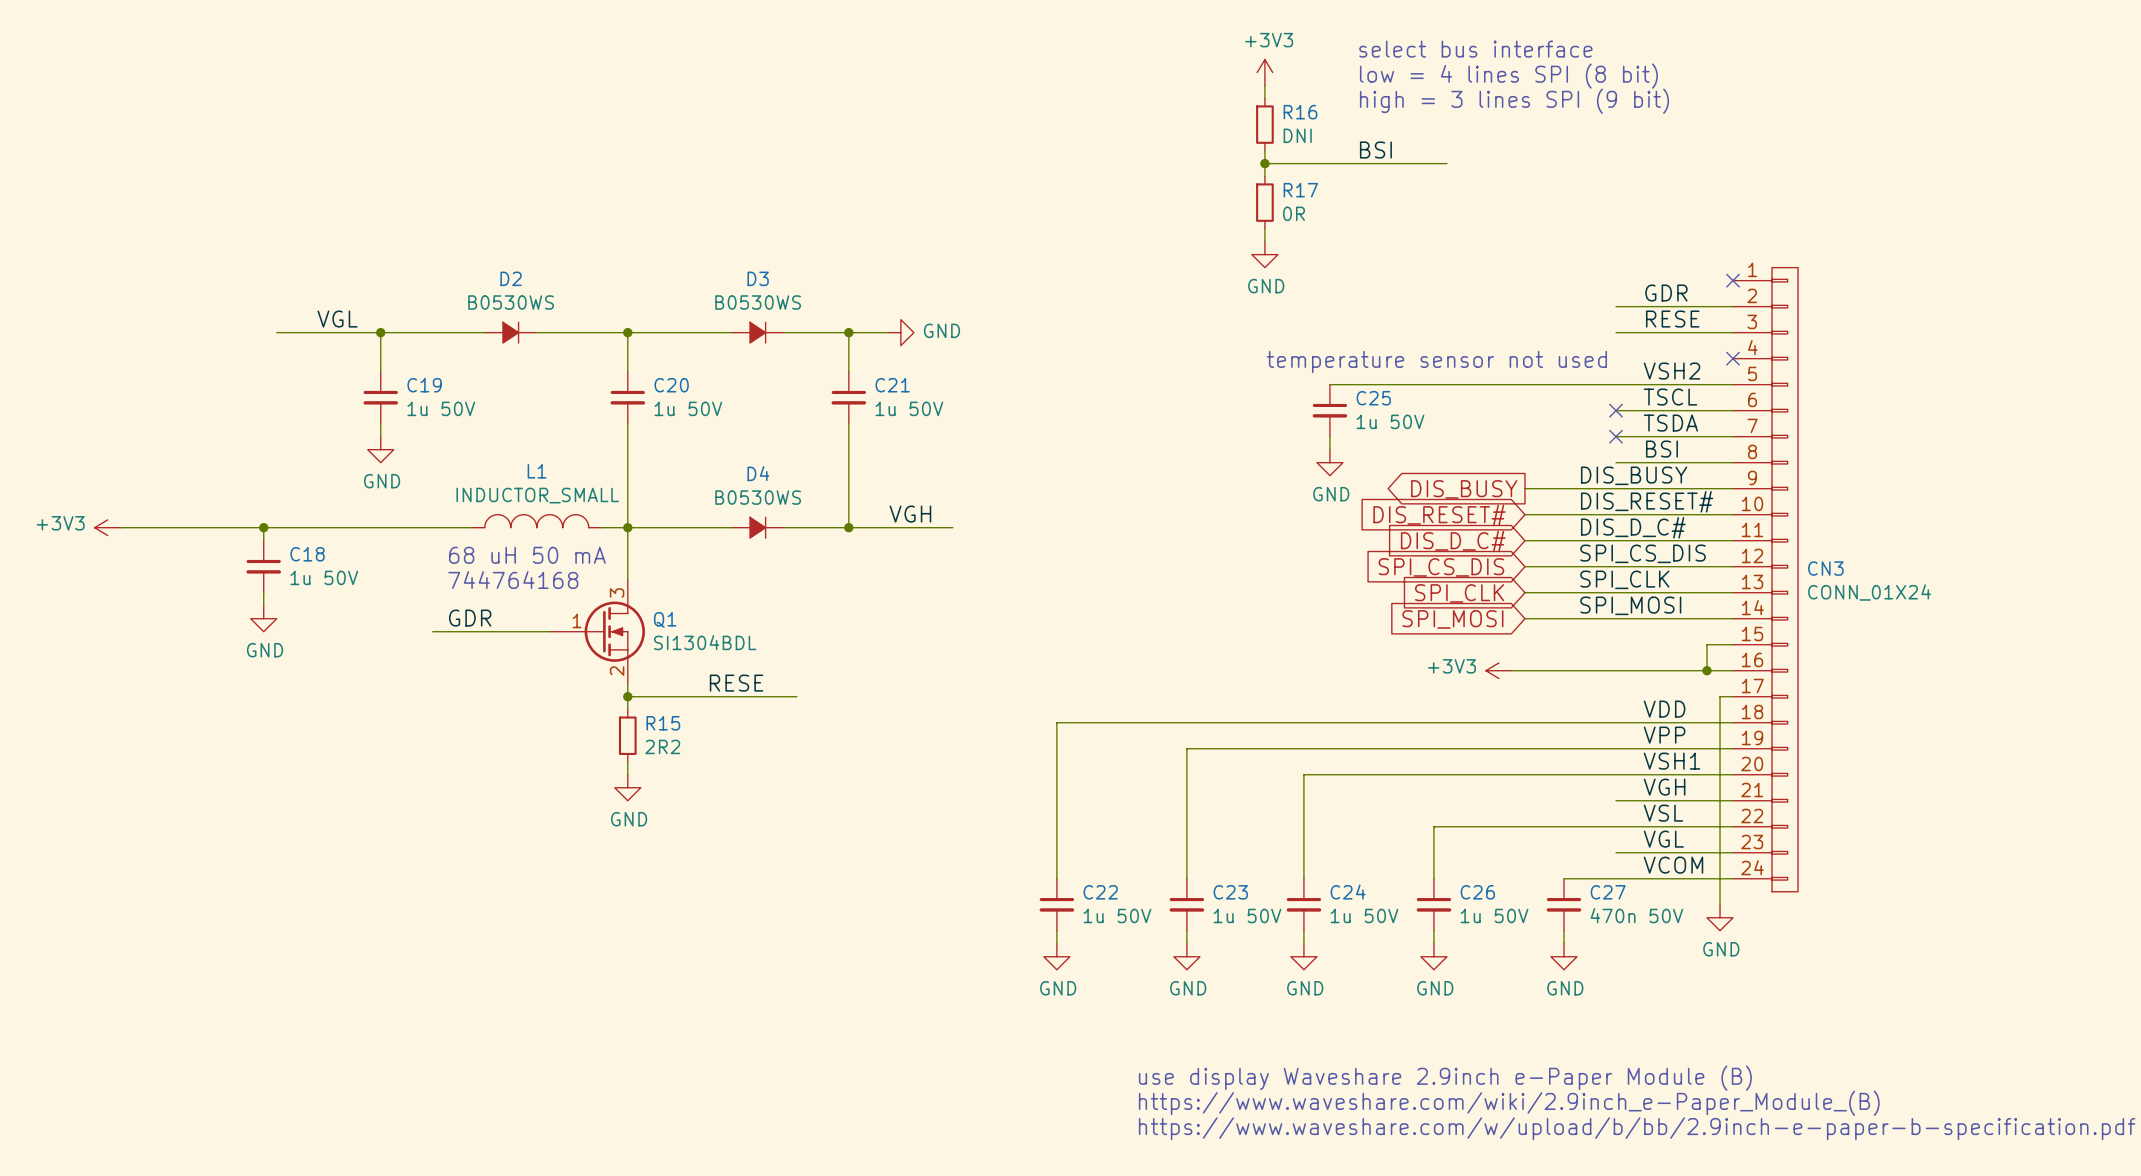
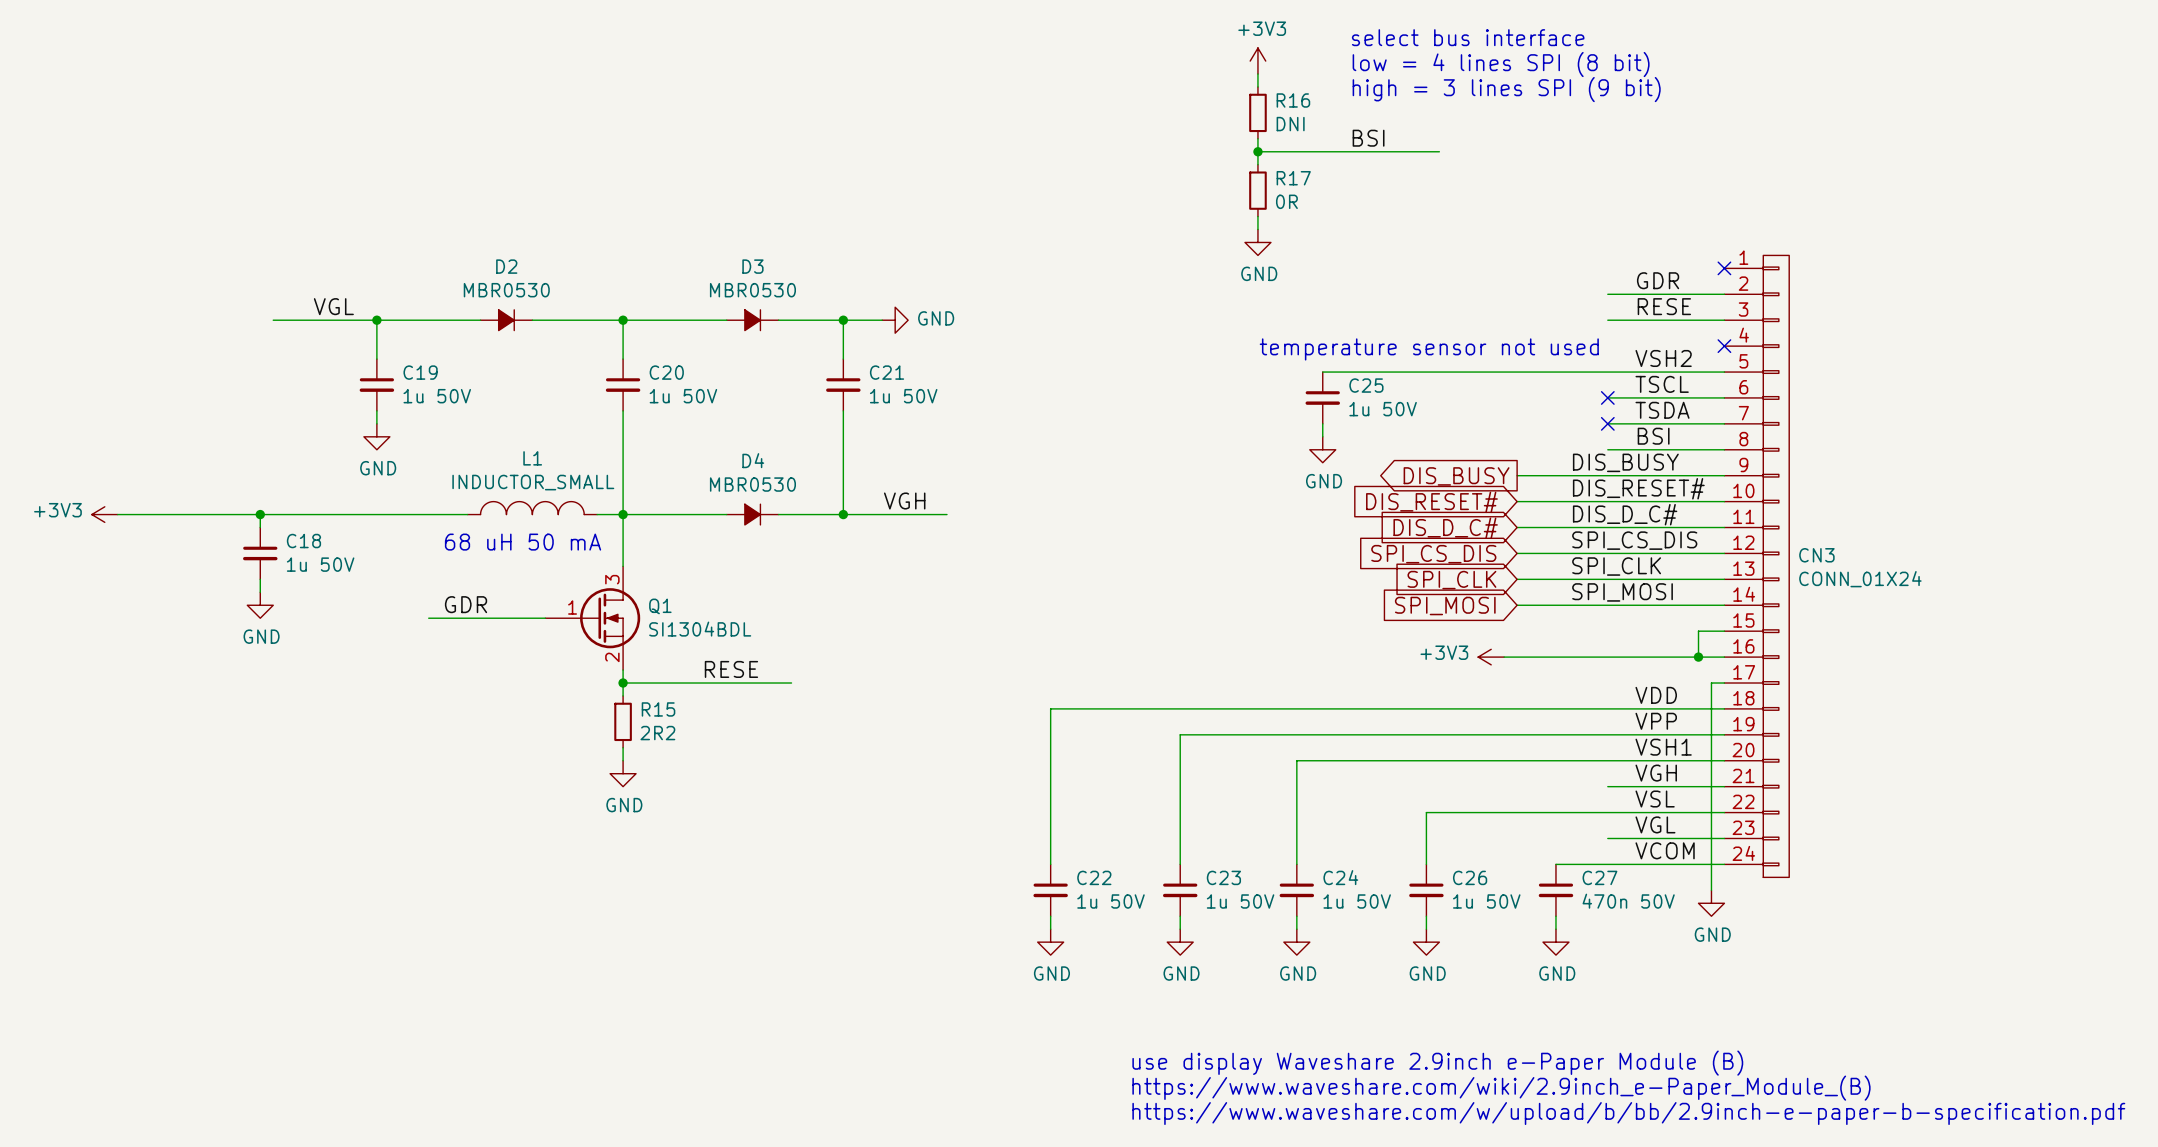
D2 value: B0530WS (511, 302) -> MBR0530 (506, 290)
D3 value: B0530WS (758, 302) -> MBR0530 (752, 290)
D4 value: B0530WS (758, 497) -> MBR0530 (752, 484)
text: 744764168 (513, 580) -> none

